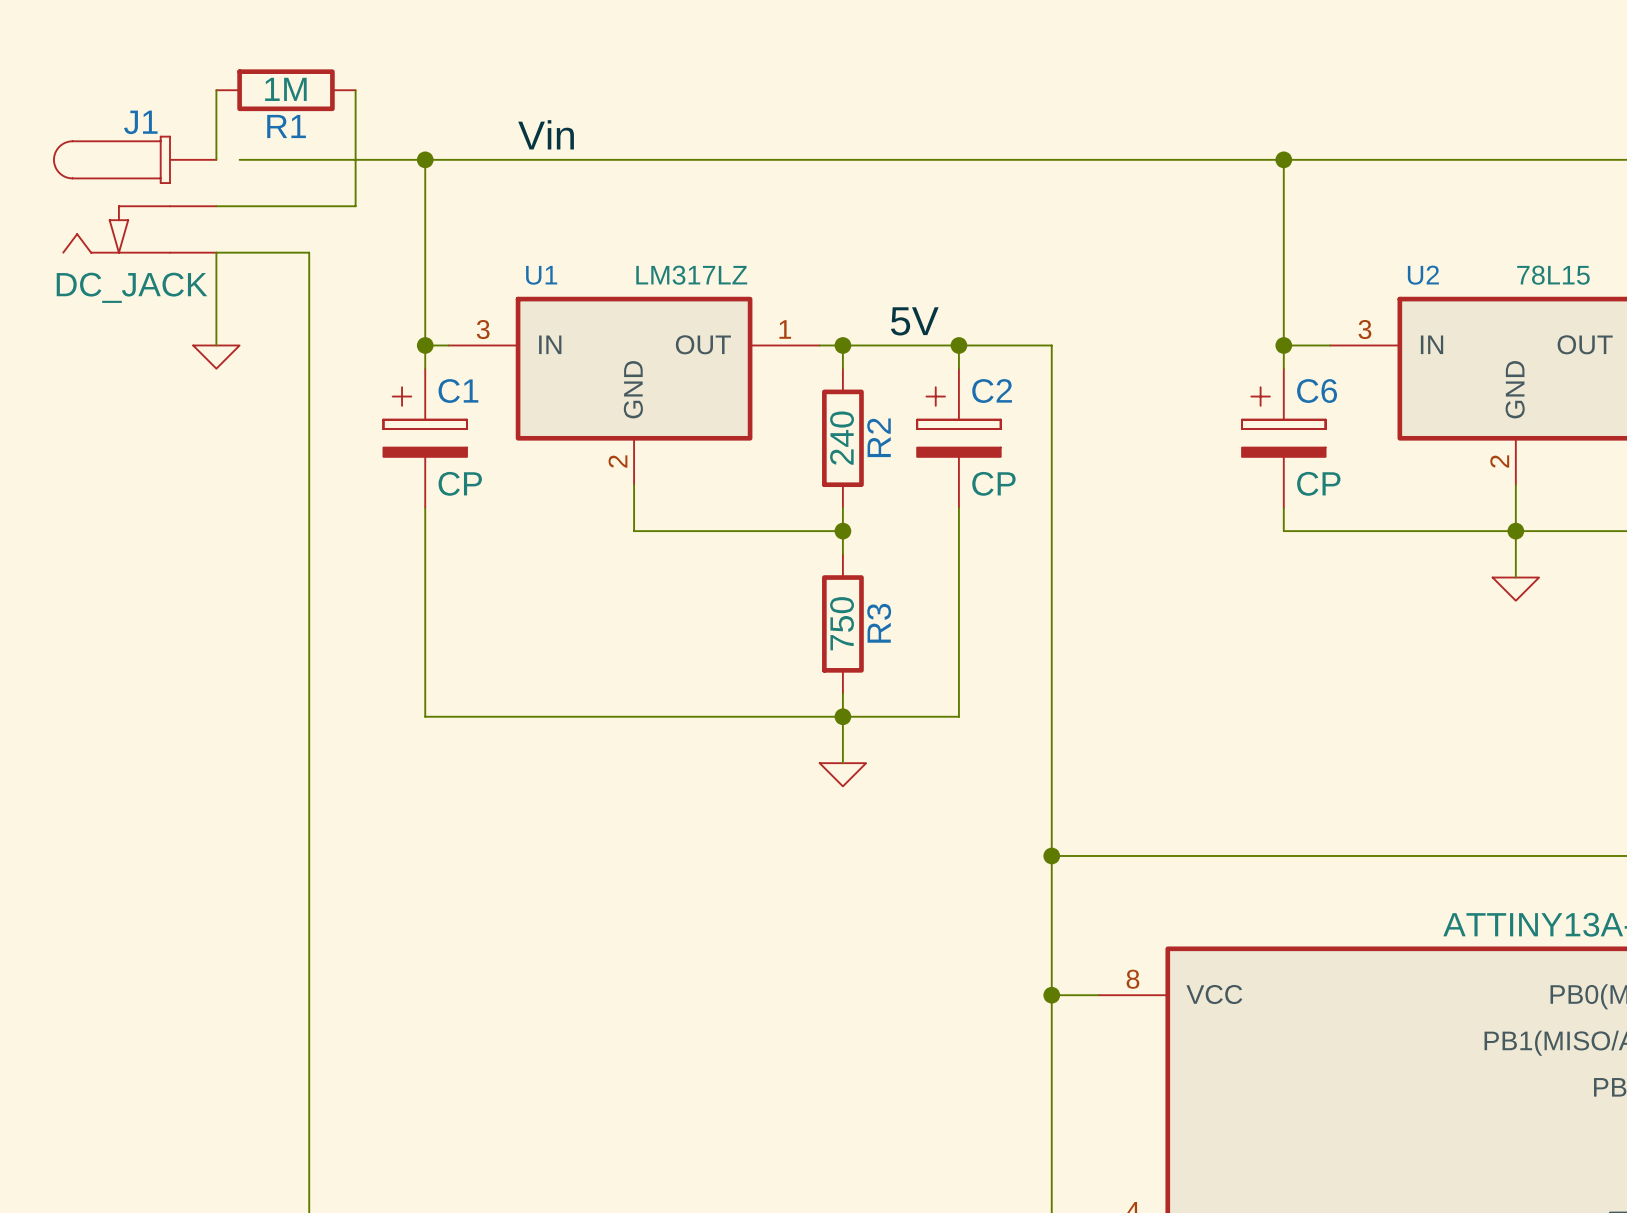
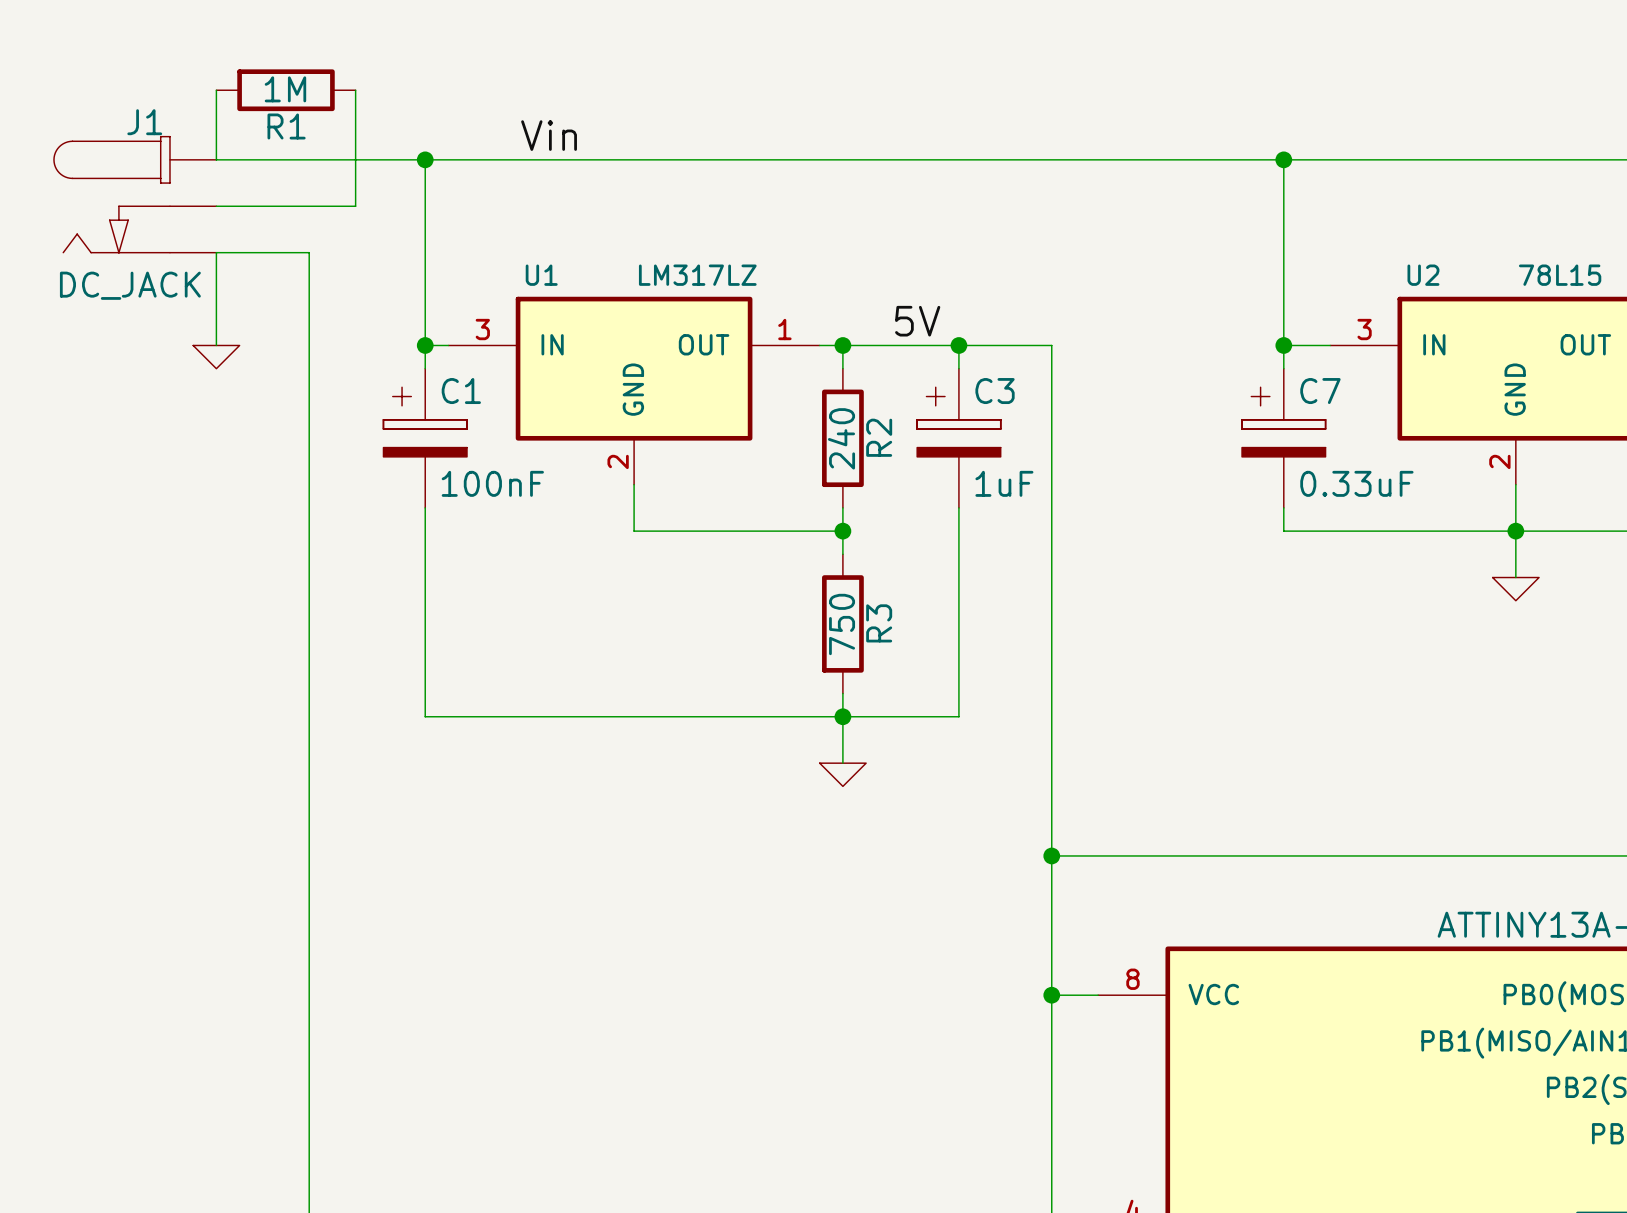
wire: none -> (216, 159) (239, 159)
C2 name: C2 (992, 391) -> C3 (995, 391)
C6 name: C6 (1317, 391) -> C7 (1320, 391)
C1 value: CP (460, 483) -> 100nF (492, 483)
C2 value: CP (993, 483) -> 1uF (1004, 483)
C6 value: CP (1318, 483) -> 0.33uF (1356, 483)

